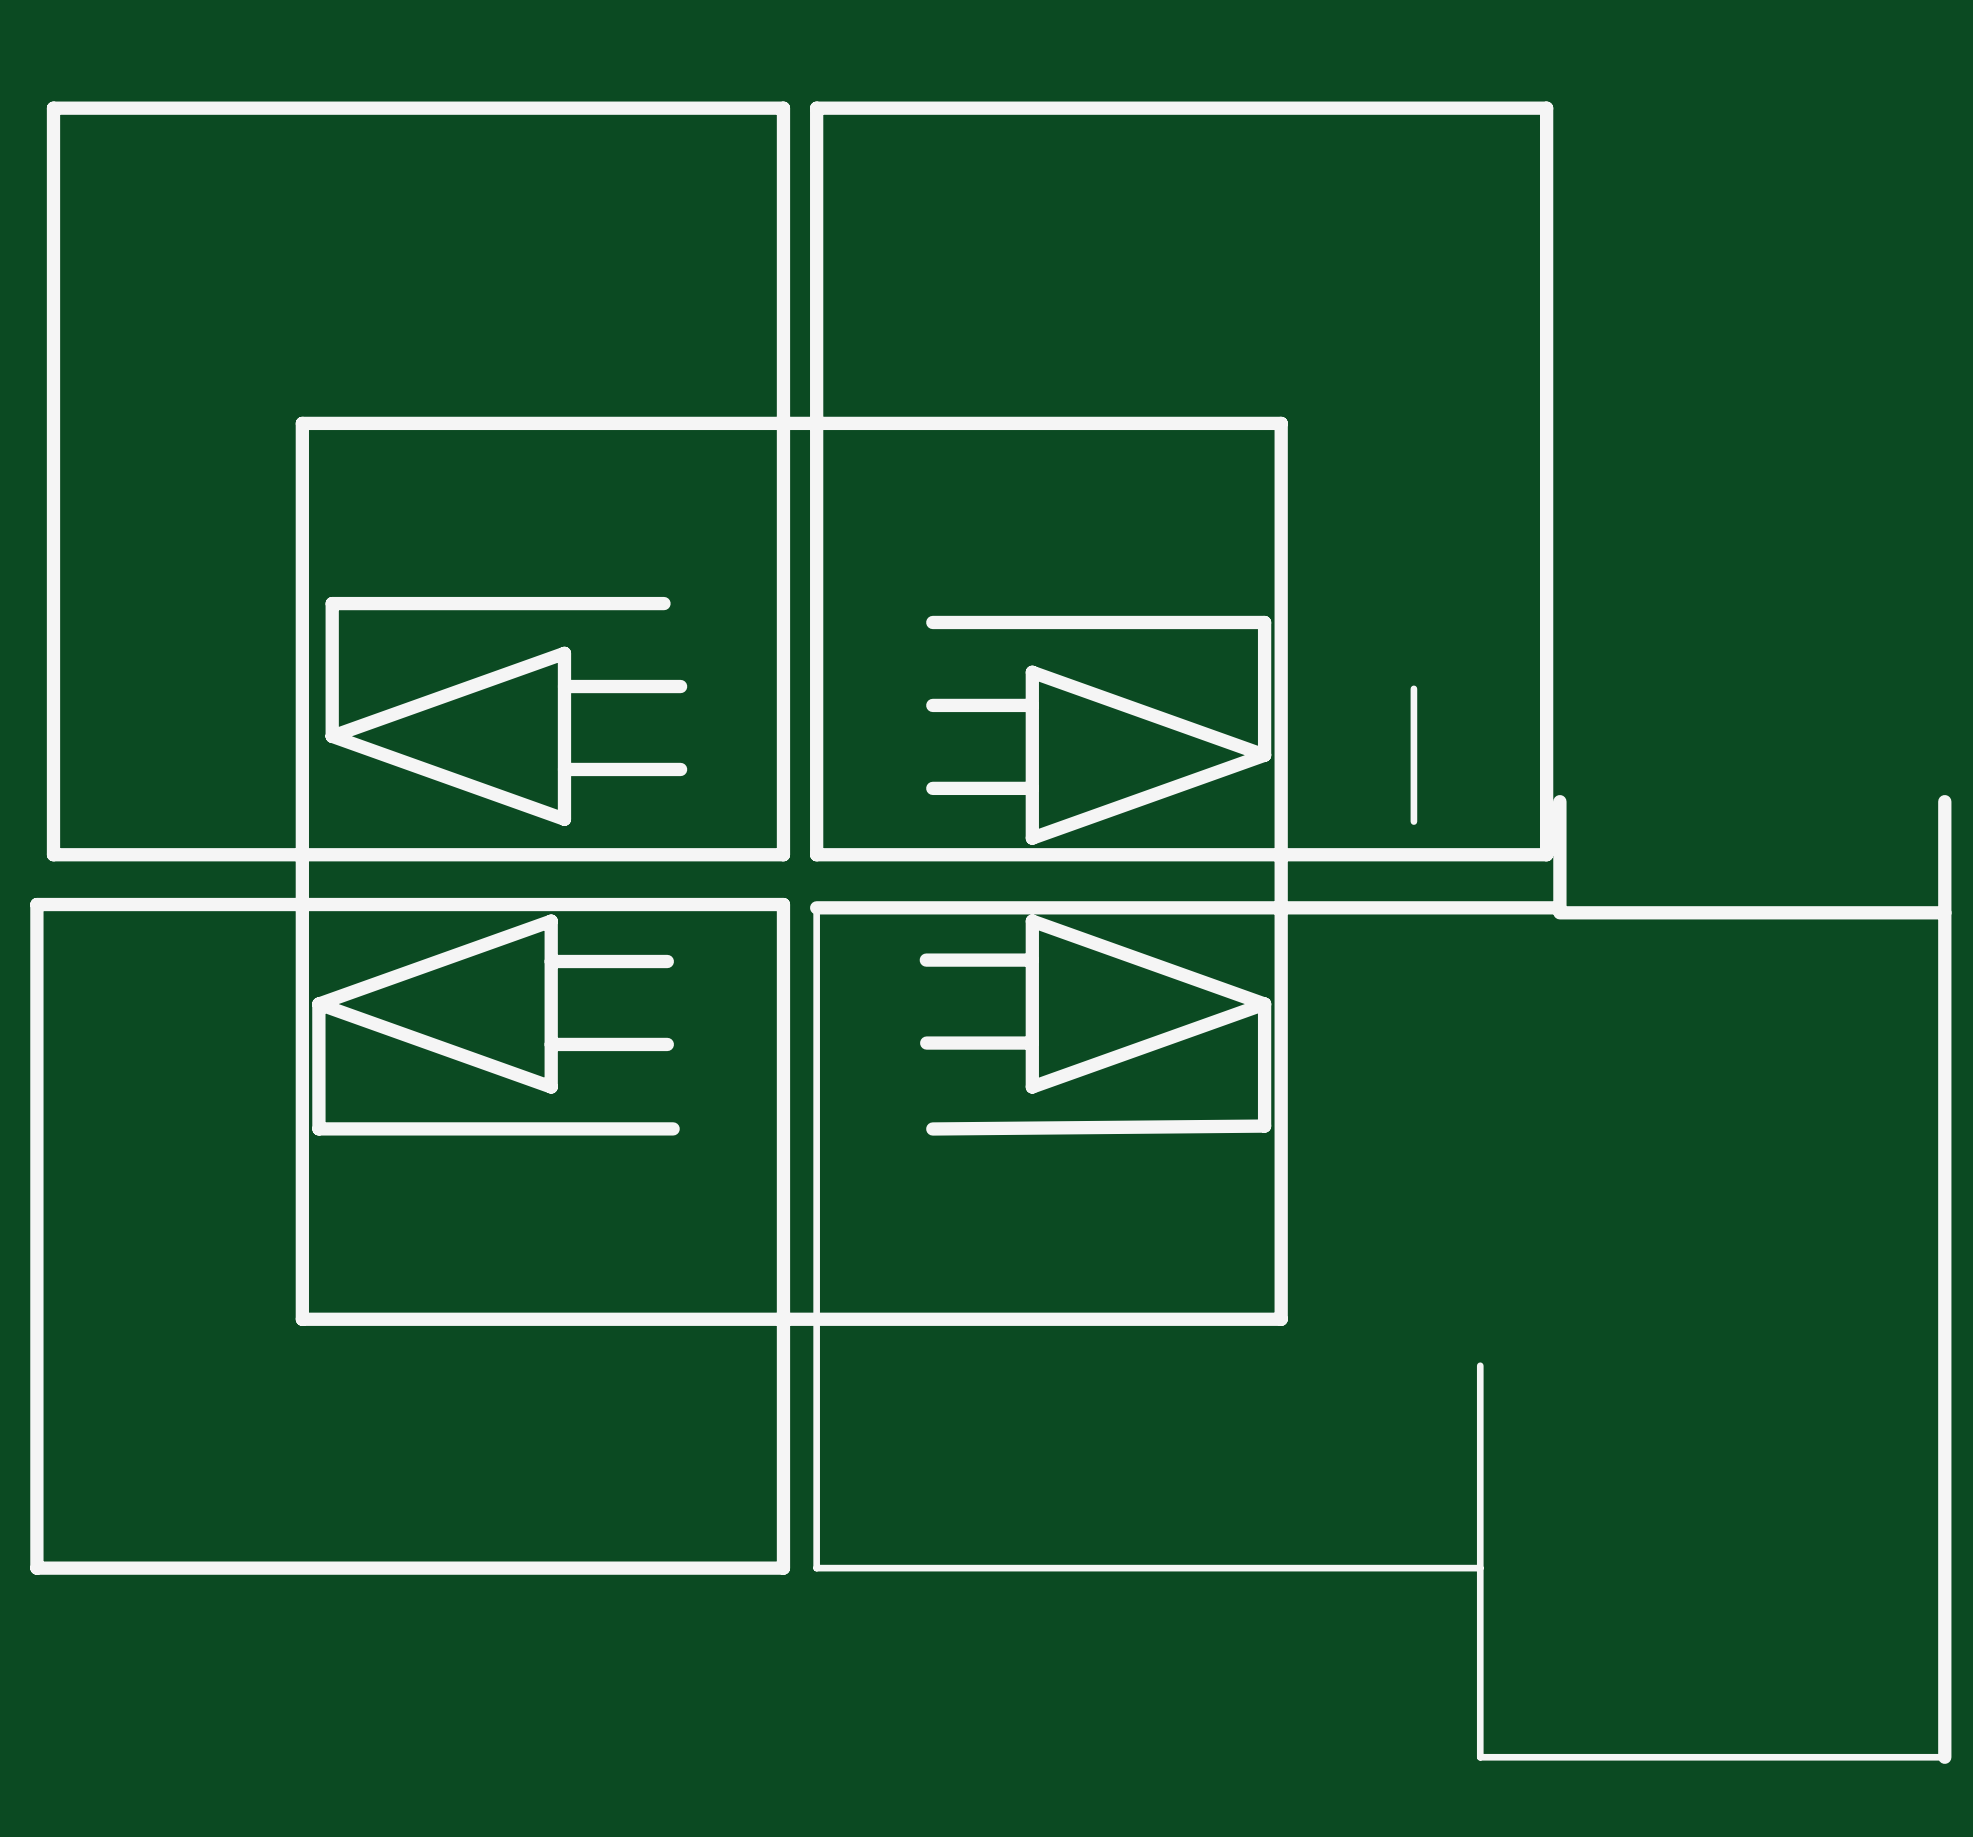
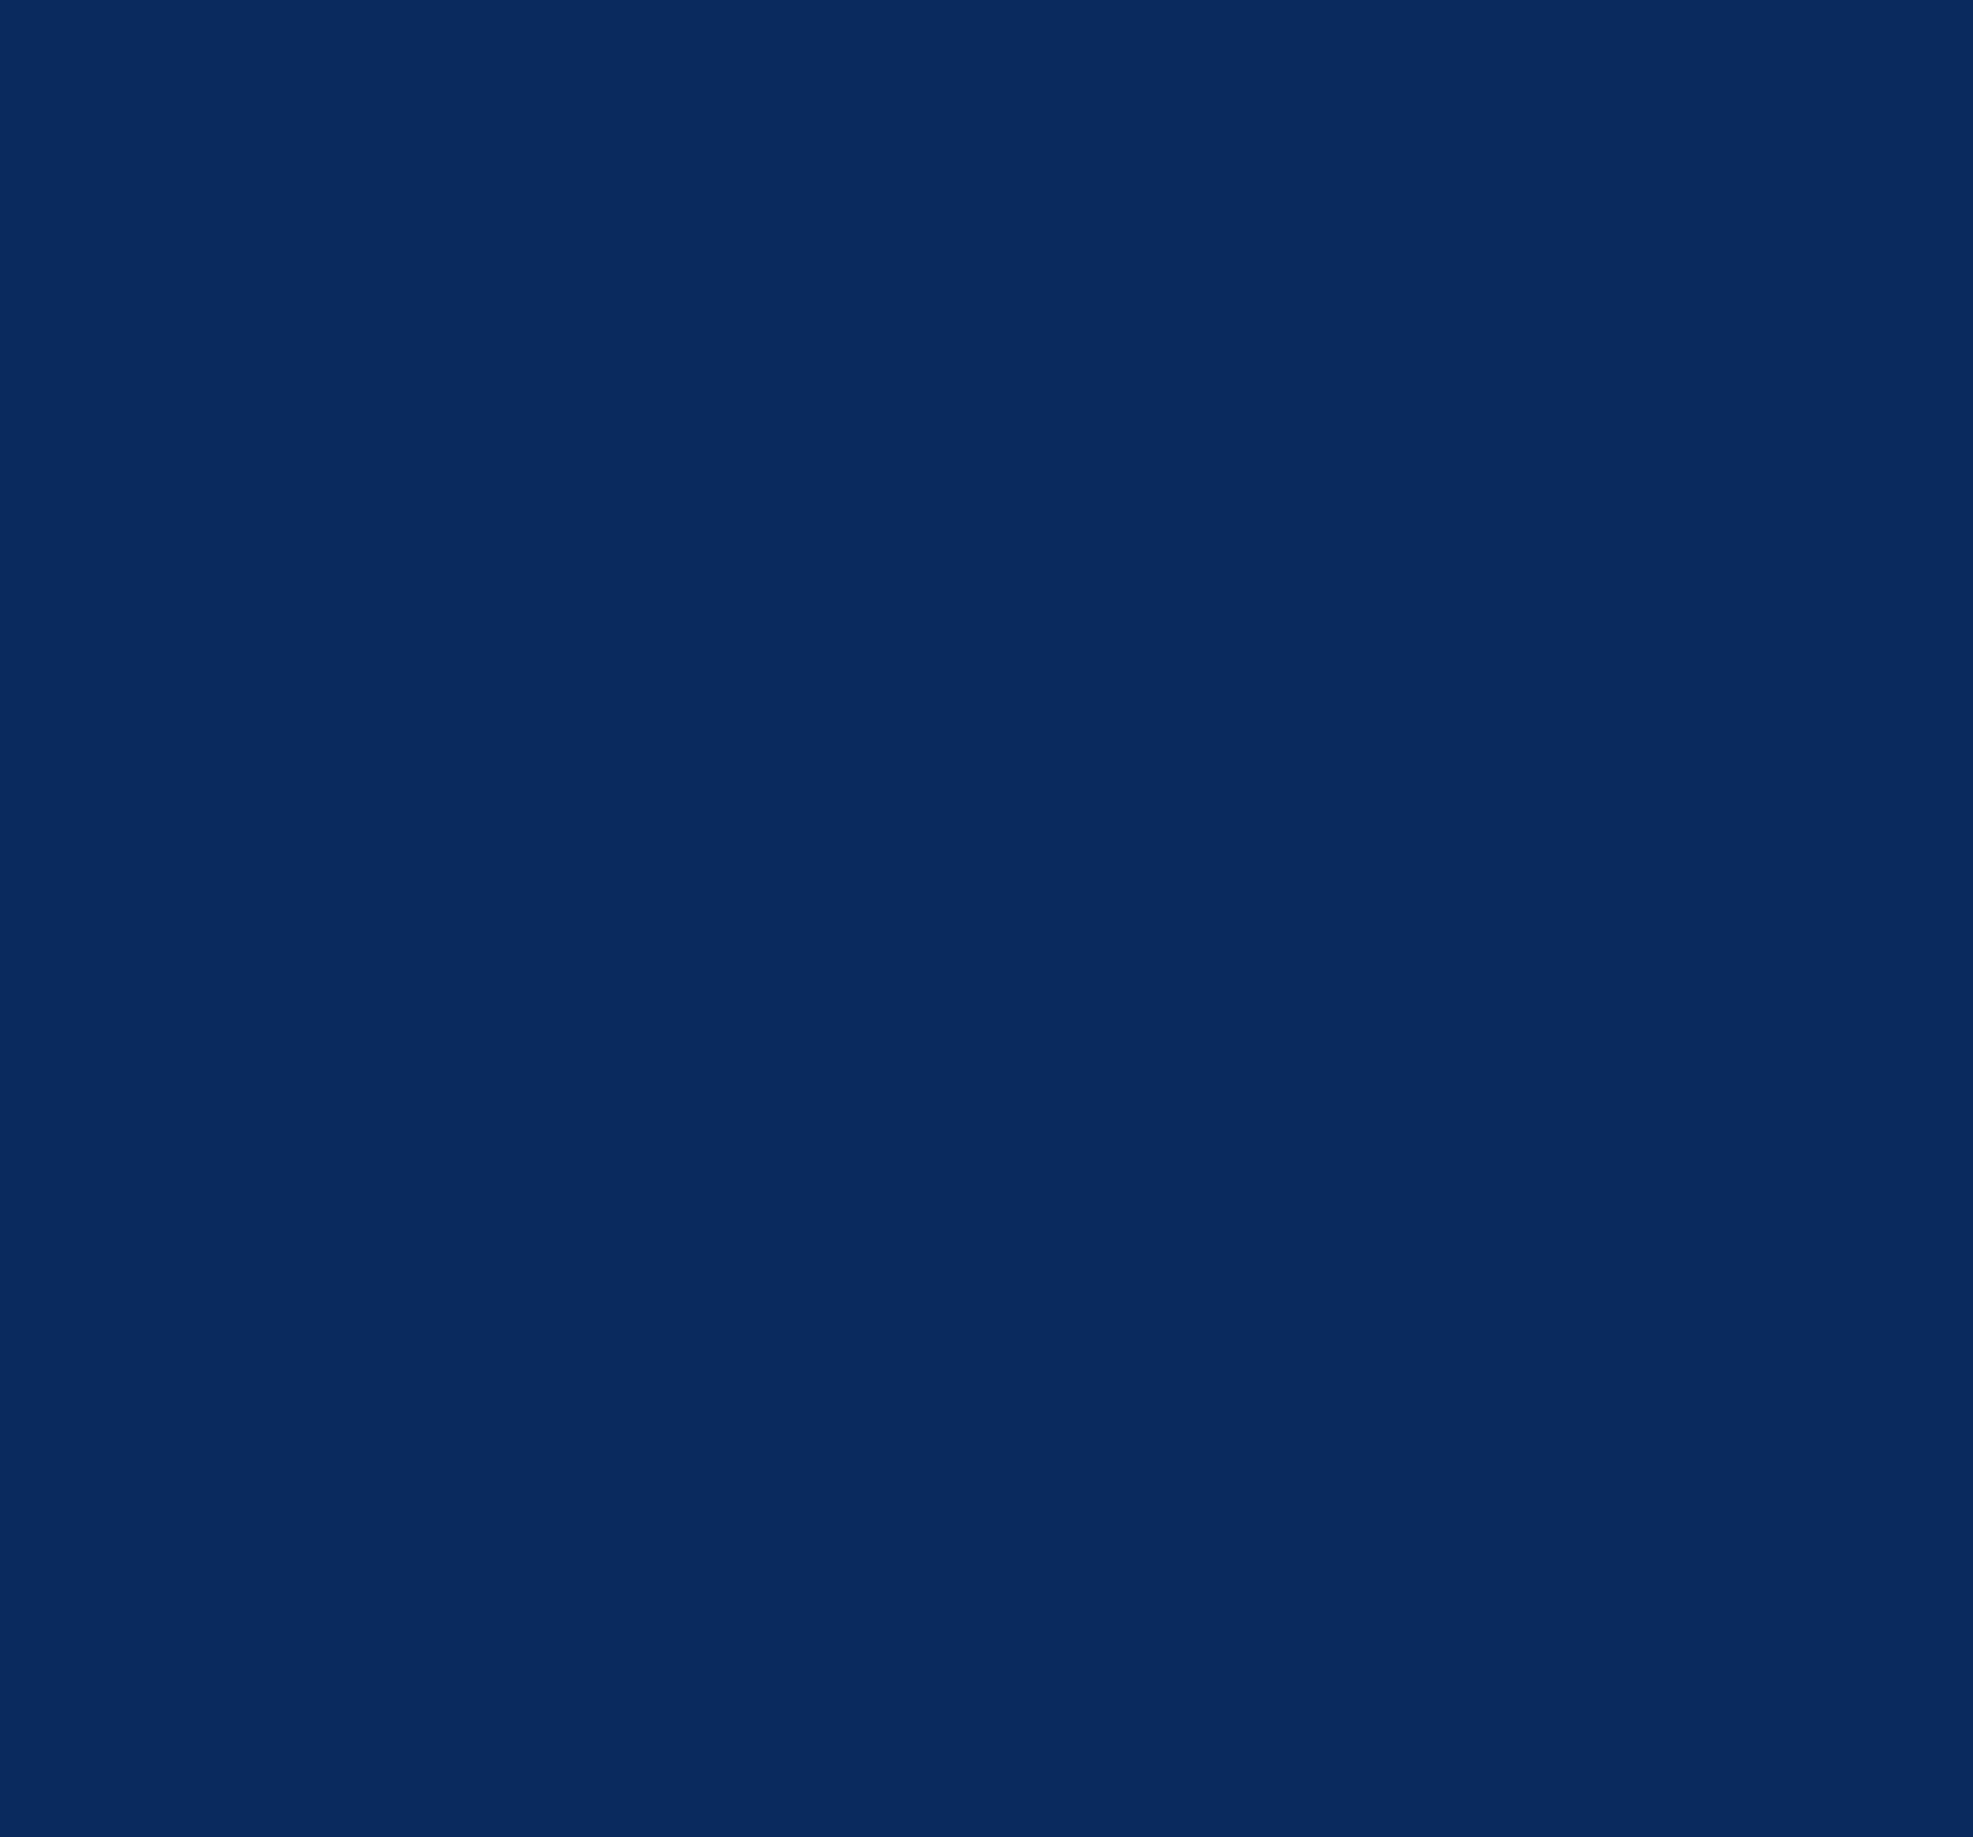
line: (53, 108) (783, 108) (783, 854) (53, 854) (53, 108) -> none
line: (816, 108) (1546, 108) (1546, 854) (816, 854) (816, 108) -> none
line: (302, 423) (1281, 423) (1281, 1319) (302, 1319) (302, 423) -> none
line: (664, 603) (332, 603) (332, 736) -> none
line: (932, 622) (1264, 622) (1264, 755) -> none
line: (564, 686) (680, 686) -> none
line: (1413, 688) (1413, 821) -> none
line: (932, 705) (1032, 705) -> none
line: (332, 736) (564, 653) (564, 819) (332, 736) -> none
line: (1264, 755) (1032, 838) (1032, 672) (1264, 755) -> none
line: (564, 769) (680, 769) -> none
line: (932, 788) (1032, 788) -> none
line: (1559, 801) (1559, 907) (816, 907) (816, 1568) (1480, 1568) -> none
line: (1944, 801) (1944, 1757) (1480, 1757) (1480, 1365) -> none
line: (36, 904) (783, 904) (783, 1568) (36, 1568) (36, 904) -> none
line: (1559, 912) (1944, 912) -> none
line: (926, 960) (1031, 960) -> none
line: (551, 961) (667, 961) -> none
line: (318, 1003) (318, 1128) (673, 1128) -> none
line: (318, 1004) (551, 921) (551, 1087) (318, 1004) -> none
line: (1264, 1004) (1264, 1126) (932, 1128) -> none
line: (1264, 1004) (1032, 921) (1032, 1087) (1264, 1004) -> none
line: (926, 1043) (1031, 1043) -> none
line: (551, 1044) (667, 1044) -> none

